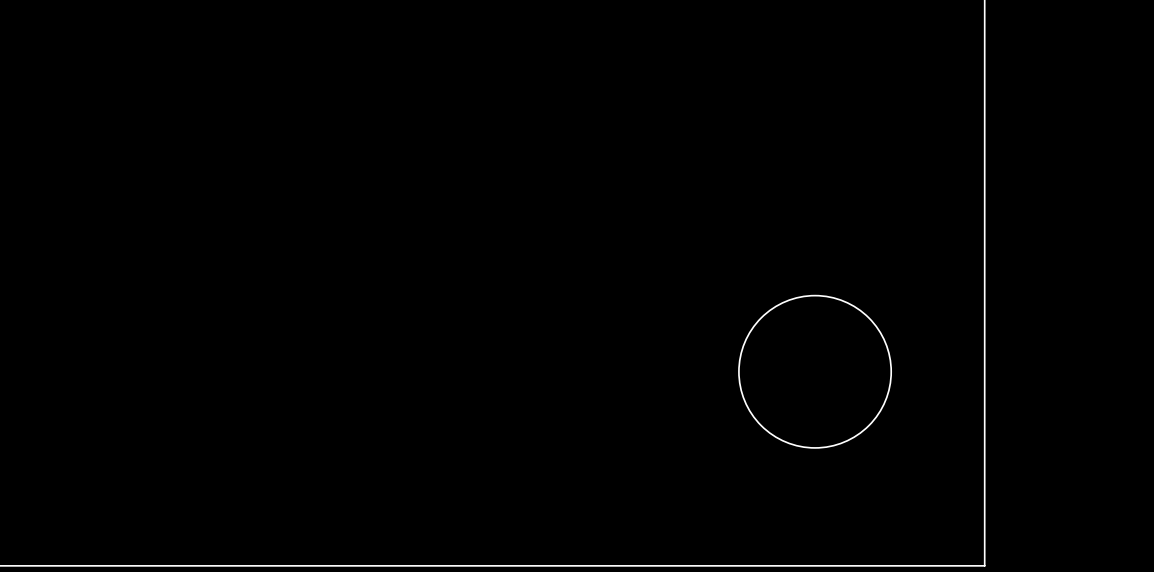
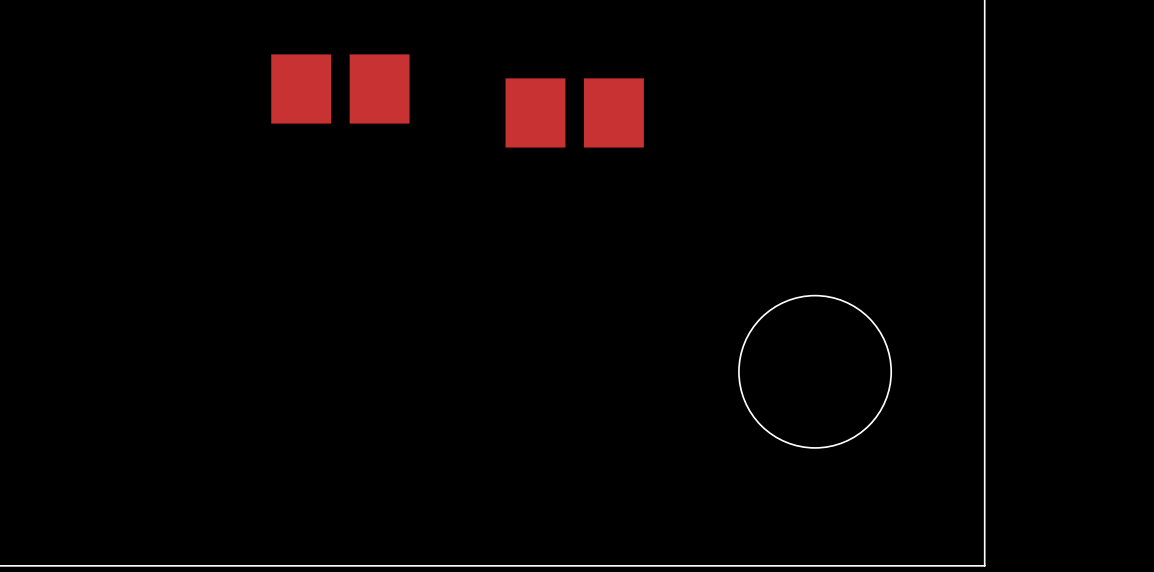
part: none -> (340, 88)
part: none -> (574, 112)

